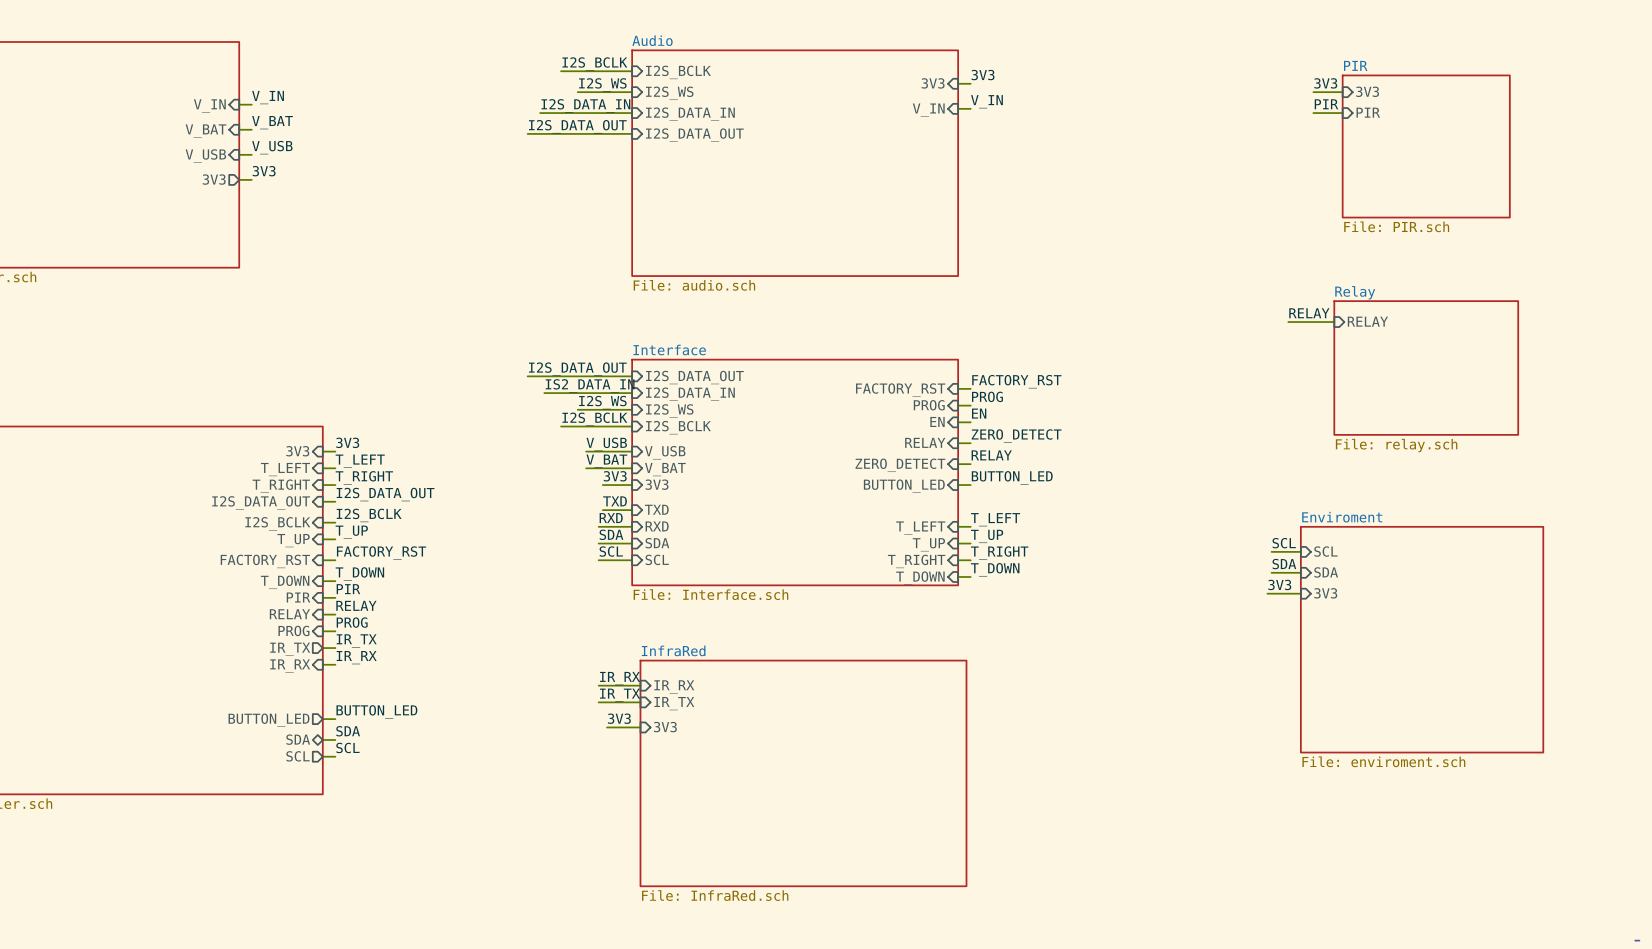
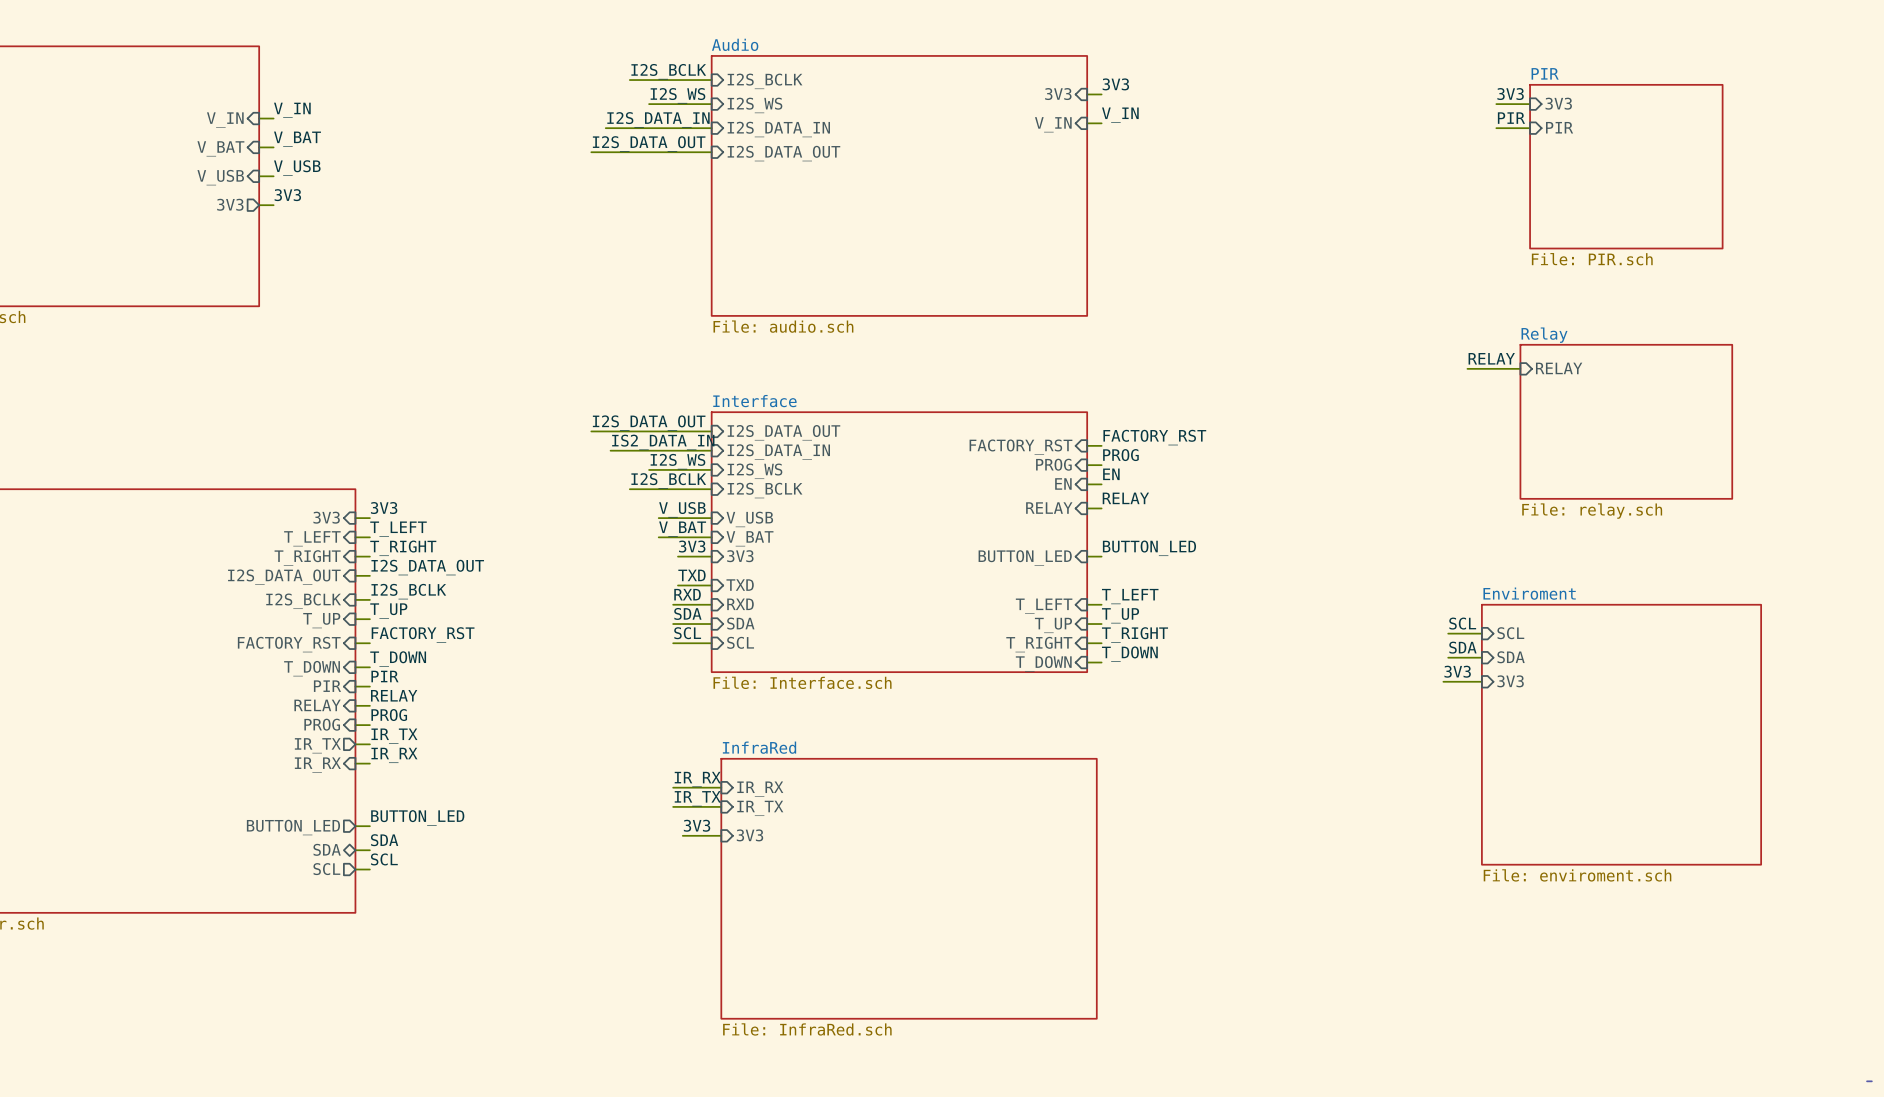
label: ZERO_DETECT (1016, 436) -> RELAY (1125, 498)
label: RELAY (991, 455) -> none
wire: (958, 464) (970, 464) -> none
sheet pin: ZERO_DETECT (900, 465) -> none

